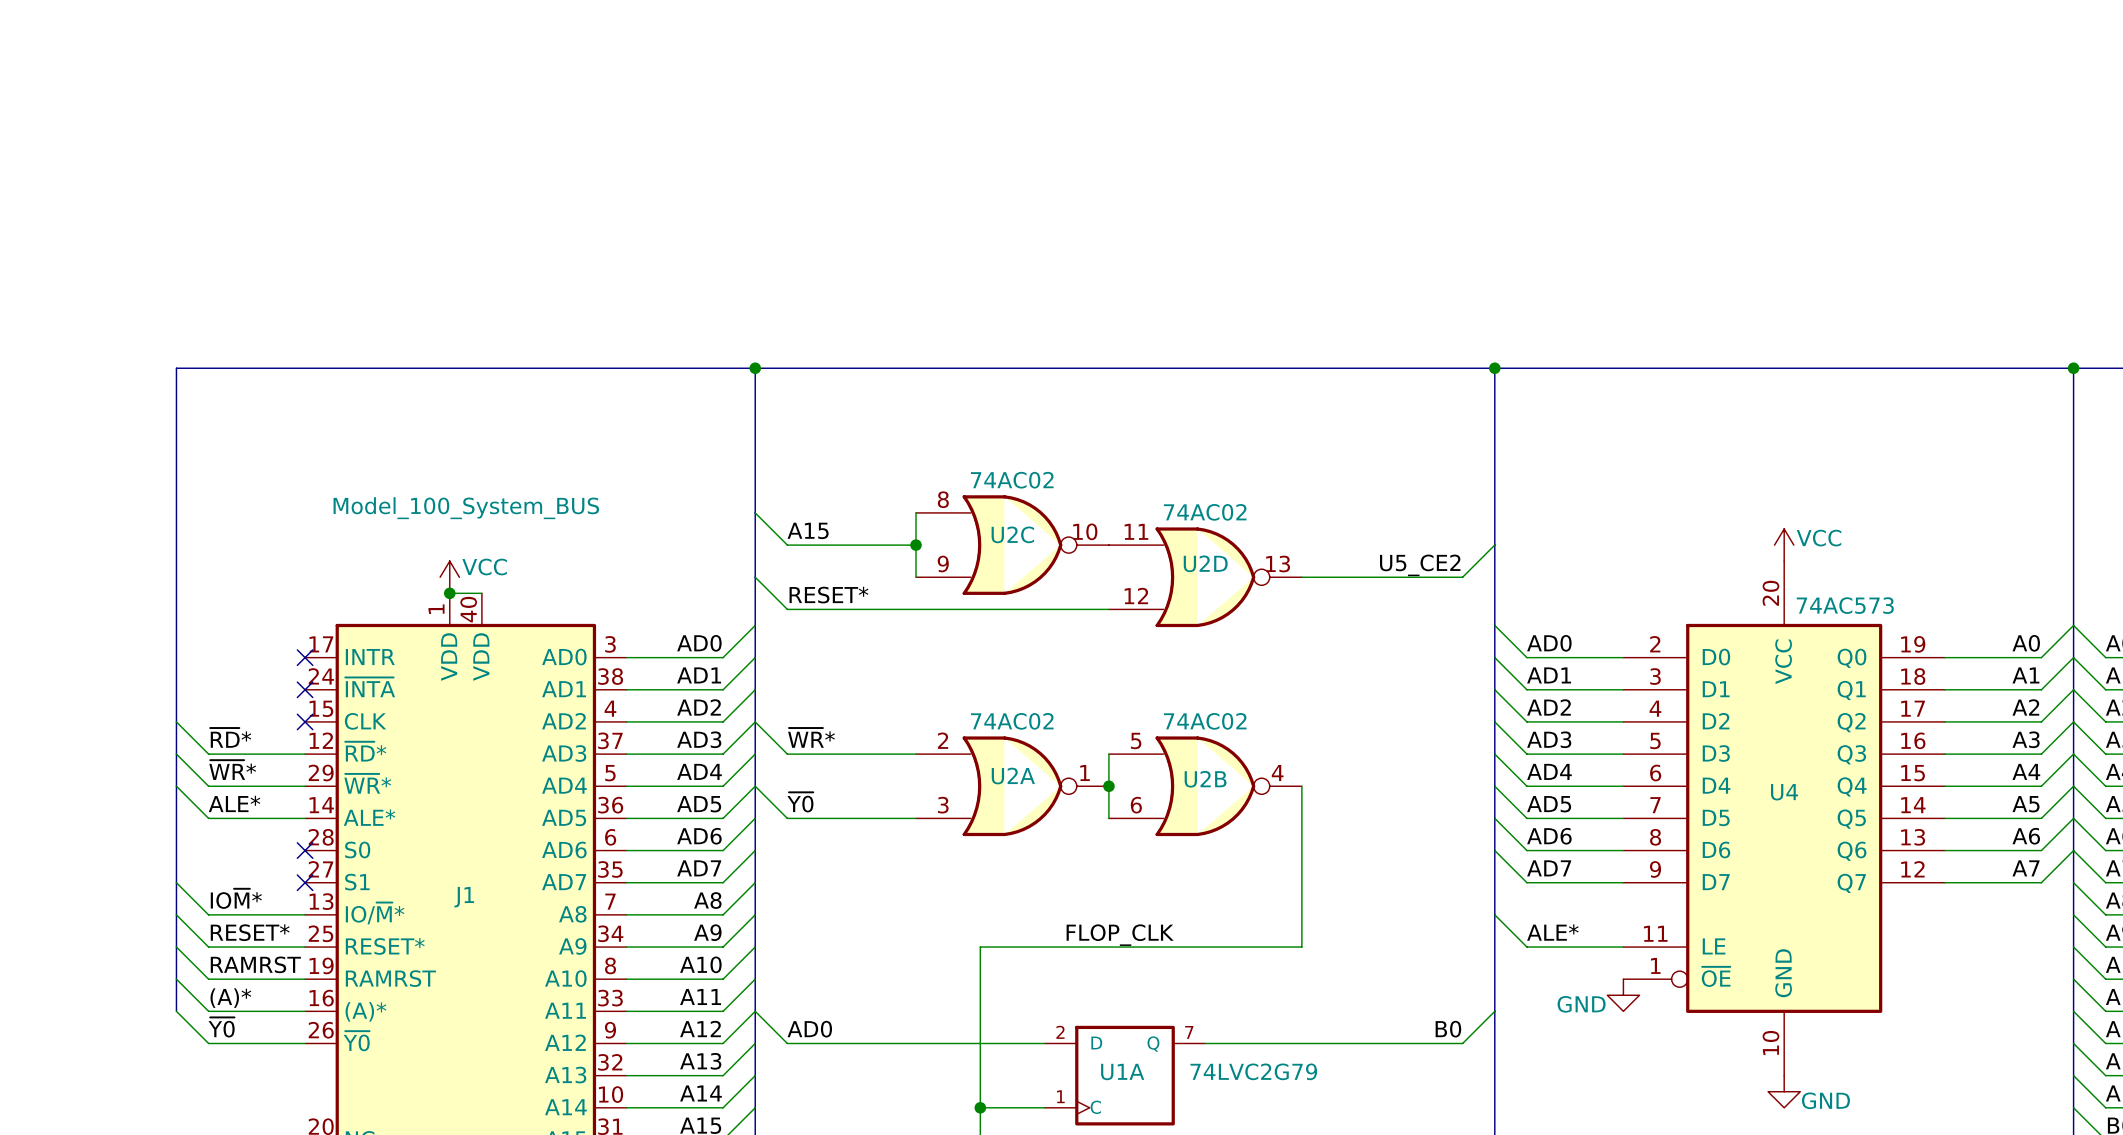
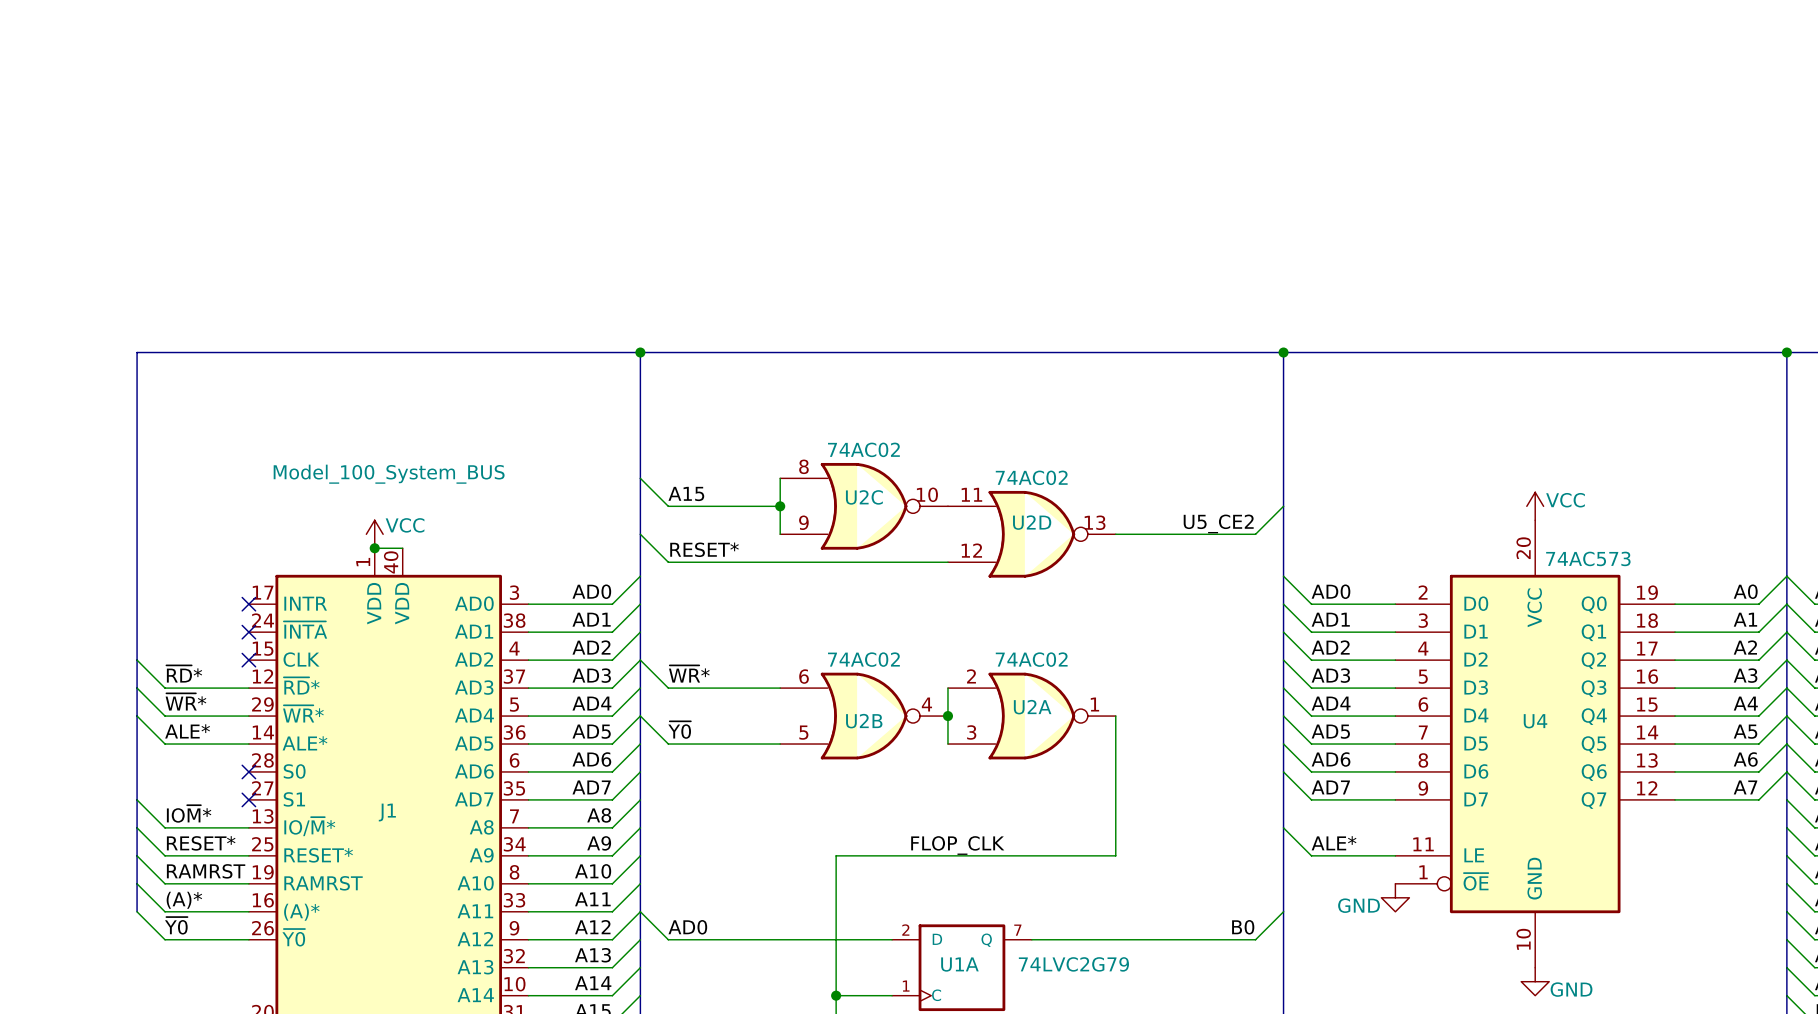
U2A position: (1012, 786) -> (1031, 716)
U2B flip: as is (1205, 786) -> up-down (864, 716)
U2B position: (1205, 786) -> (864, 716)

